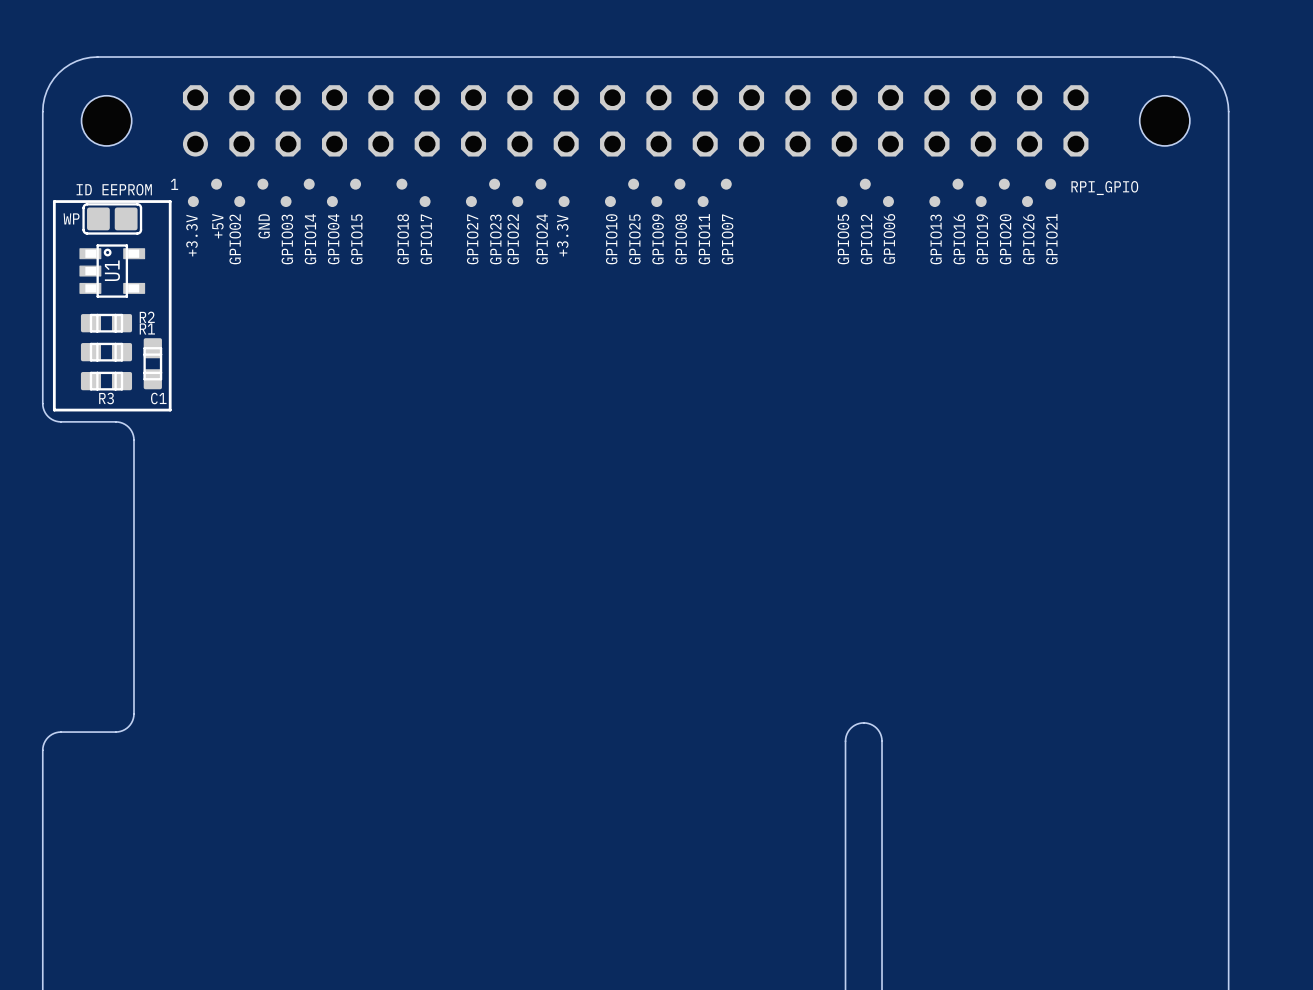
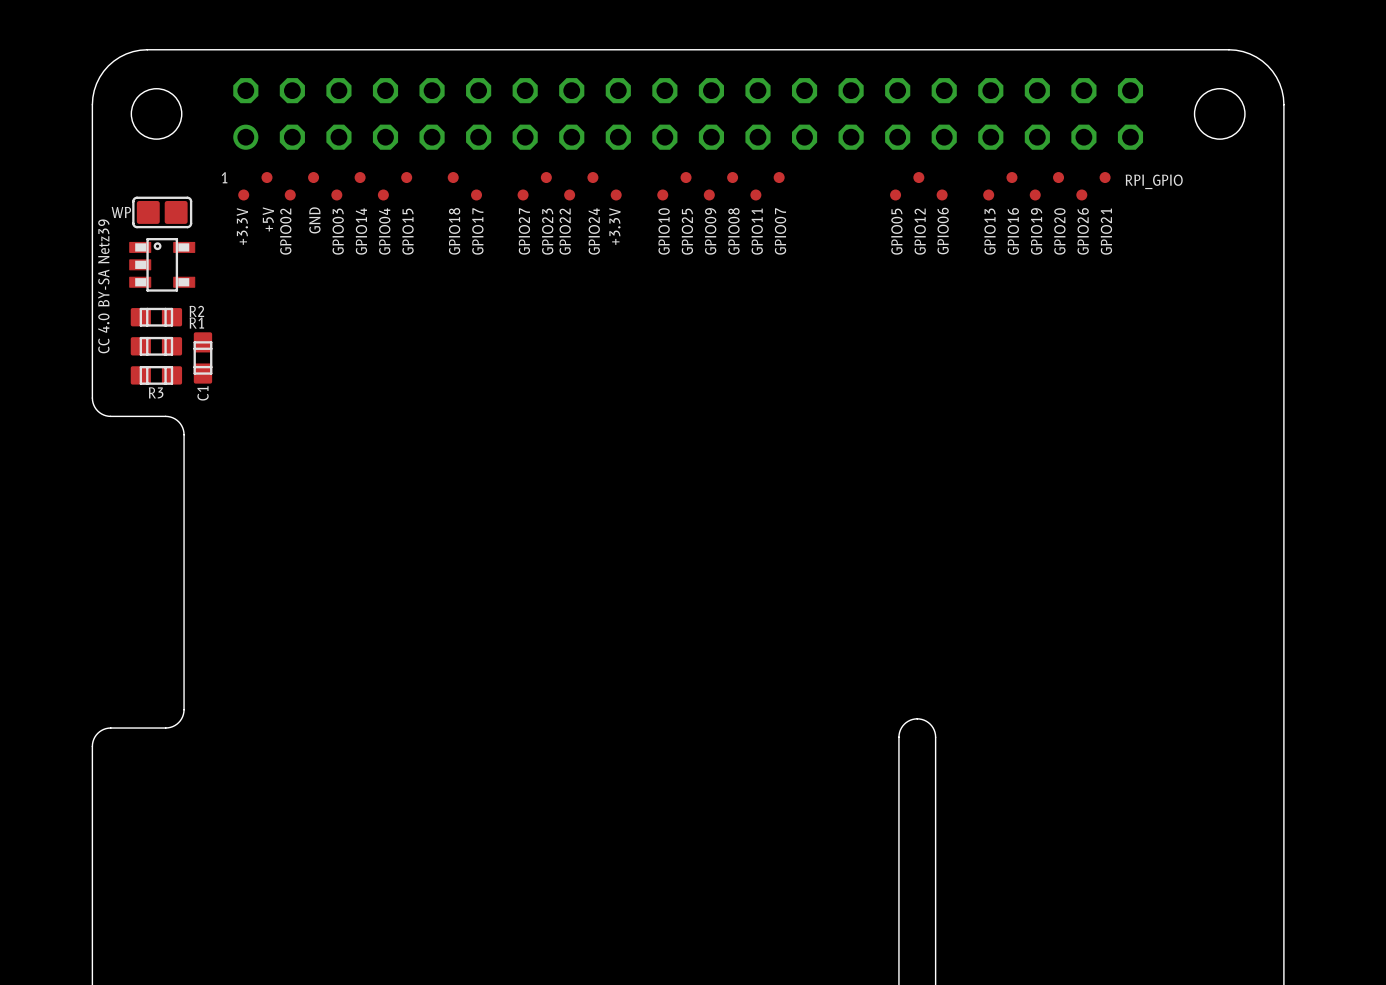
text: ID EEPROM (114, 189) -> none
line: (54, 201) (170, 201) (170, 410) (54, 410) (54, 201) -> none
U1 name: U1 (112, 270) -> none
text: none -> CC 4.0 BY-SA Netz39 (103, 286)
C1 name rotation: 0° (158, 398) -> 90° counterclockwise (203, 393)

